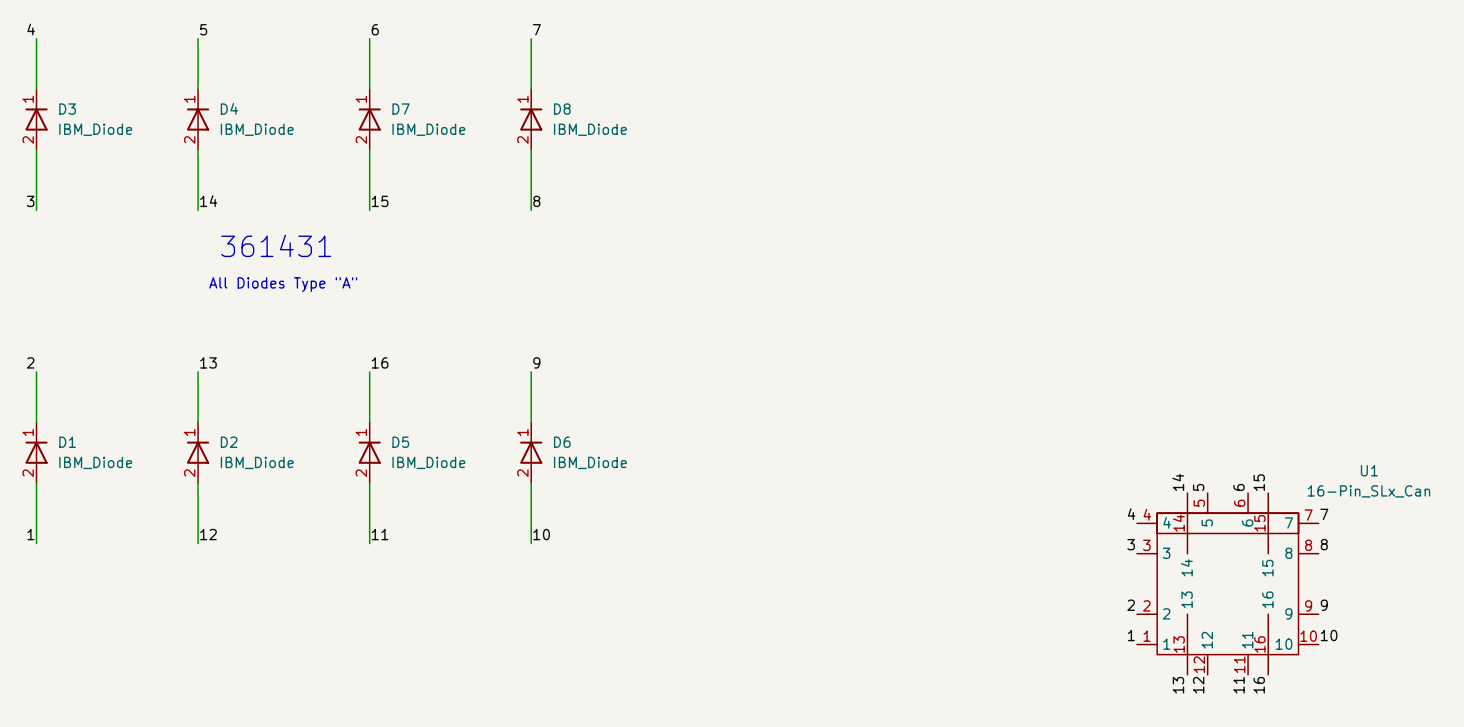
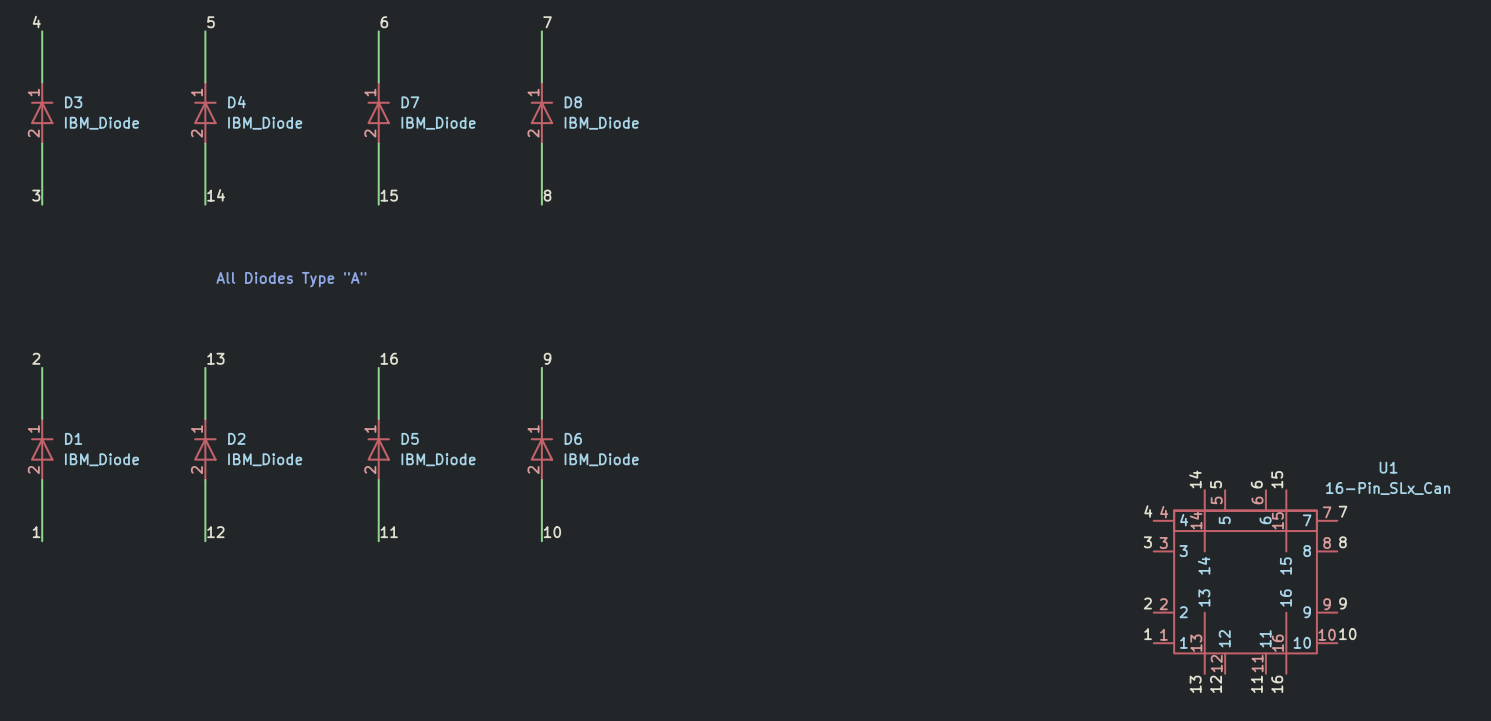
text: 361431 (276, 245) -> none

